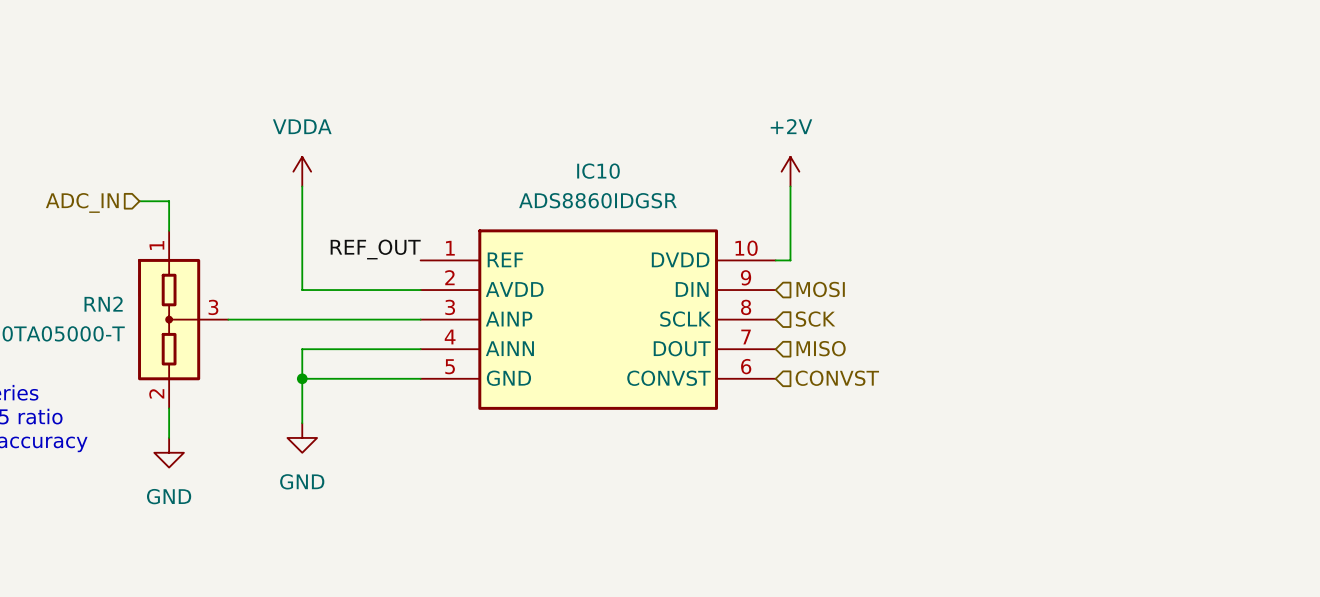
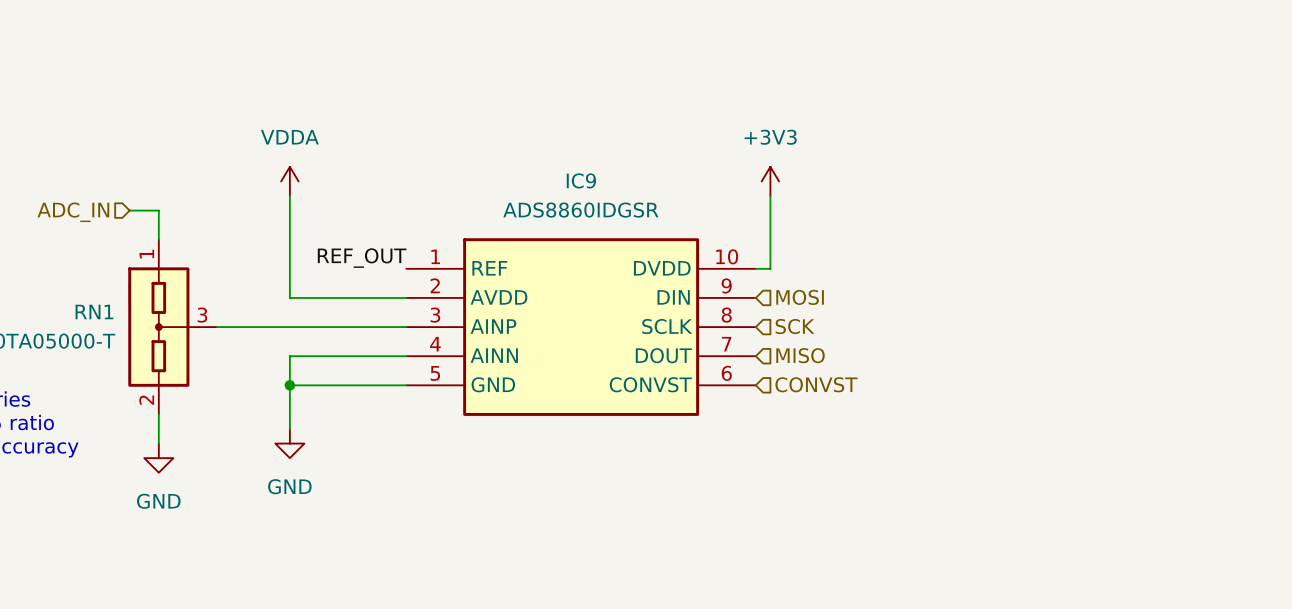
IC10 name: IC10 (598, 171) -> IC9 (581, 180)
power symbol: +2V (790, 171) -> +3V3 (770, 181)
RN2 name: RN2 (103, 304) -> RN1 (94, 311)

